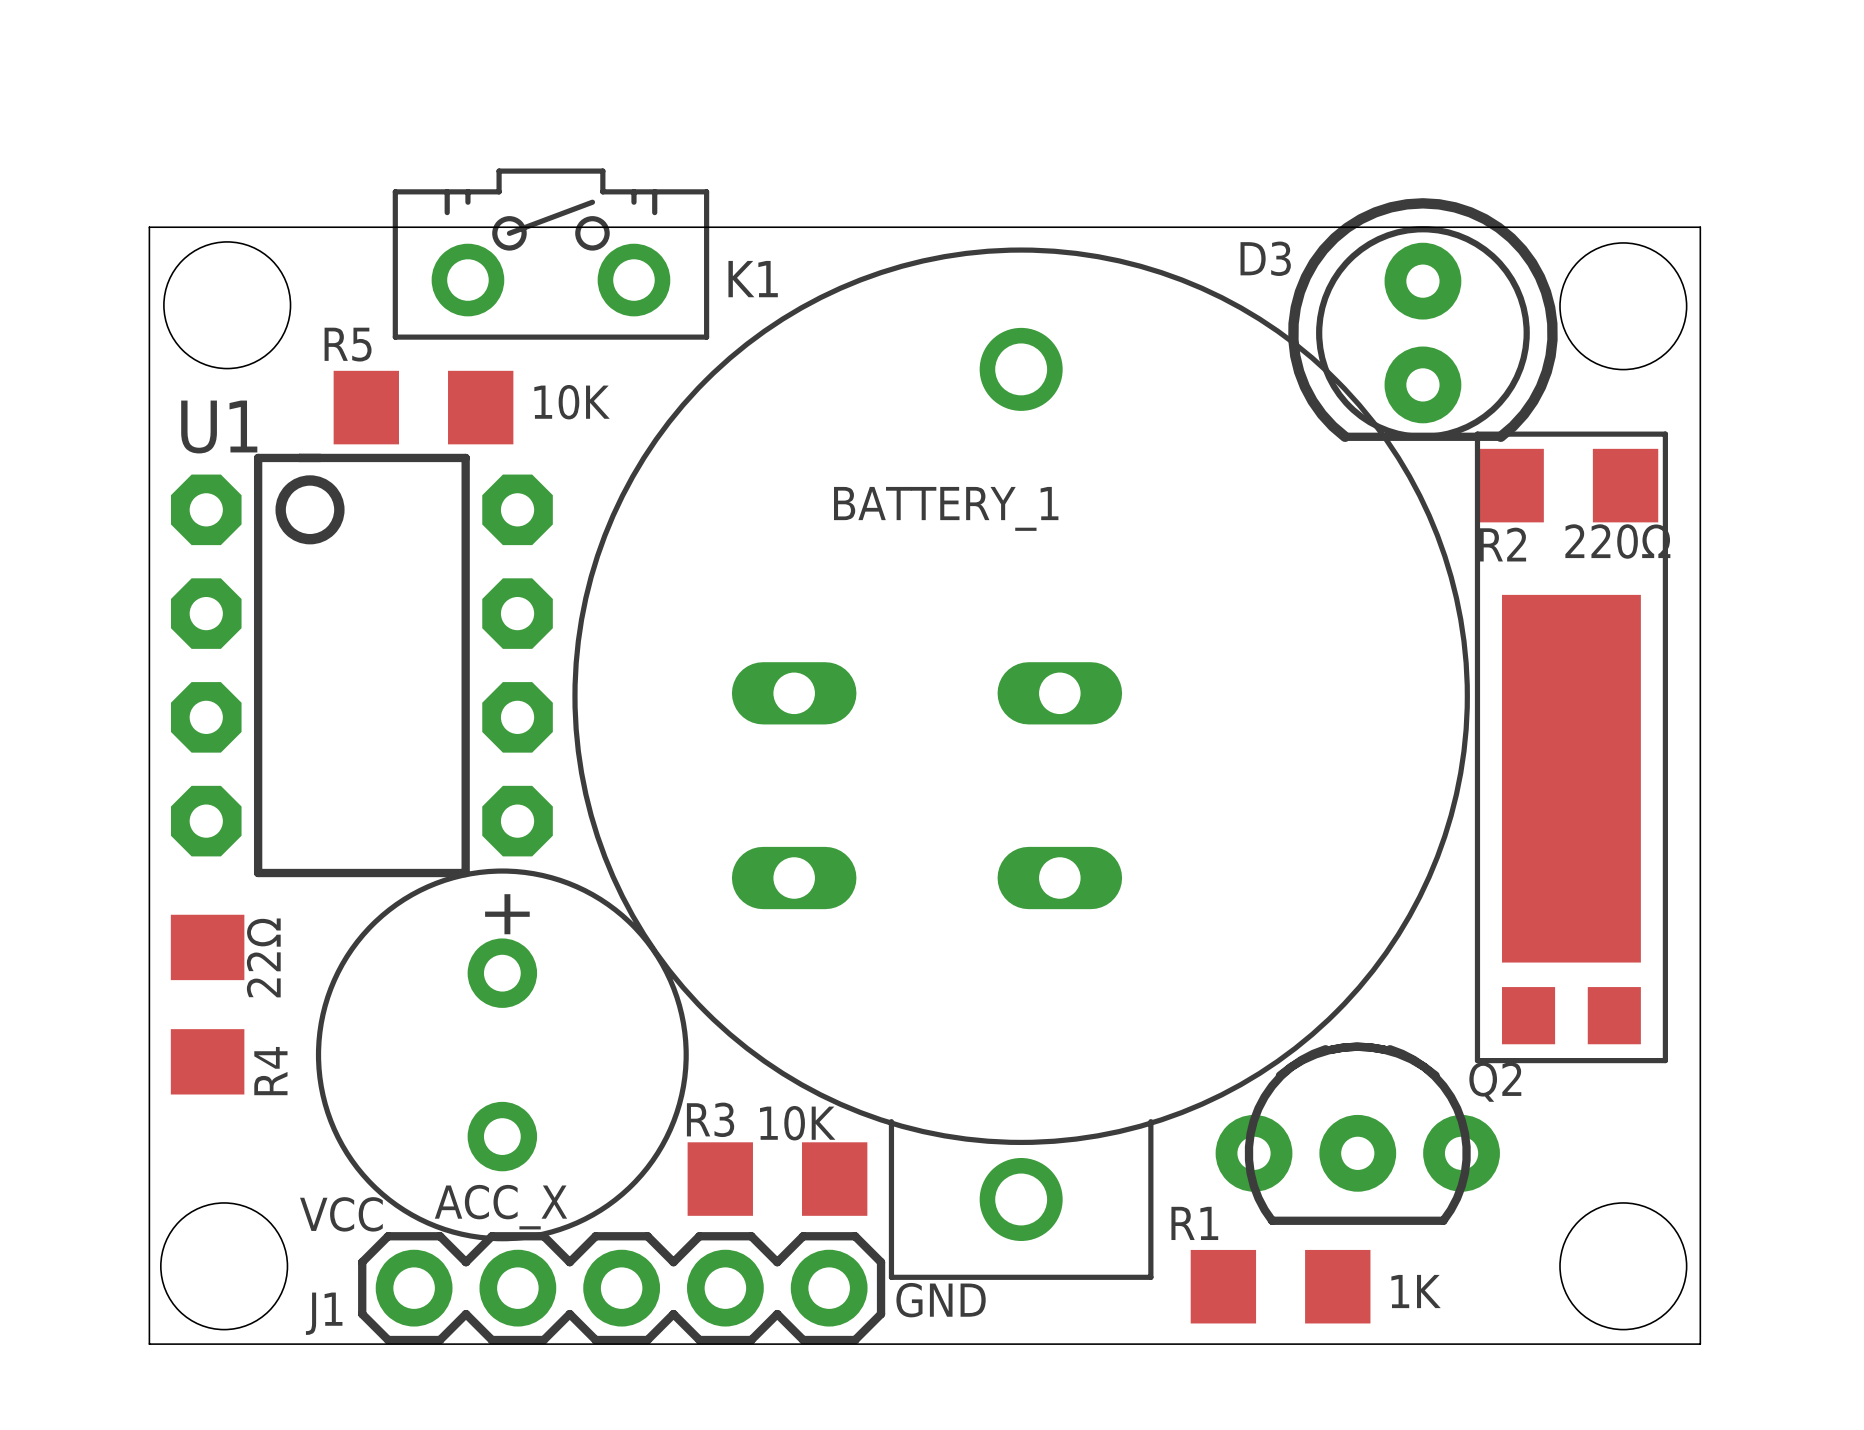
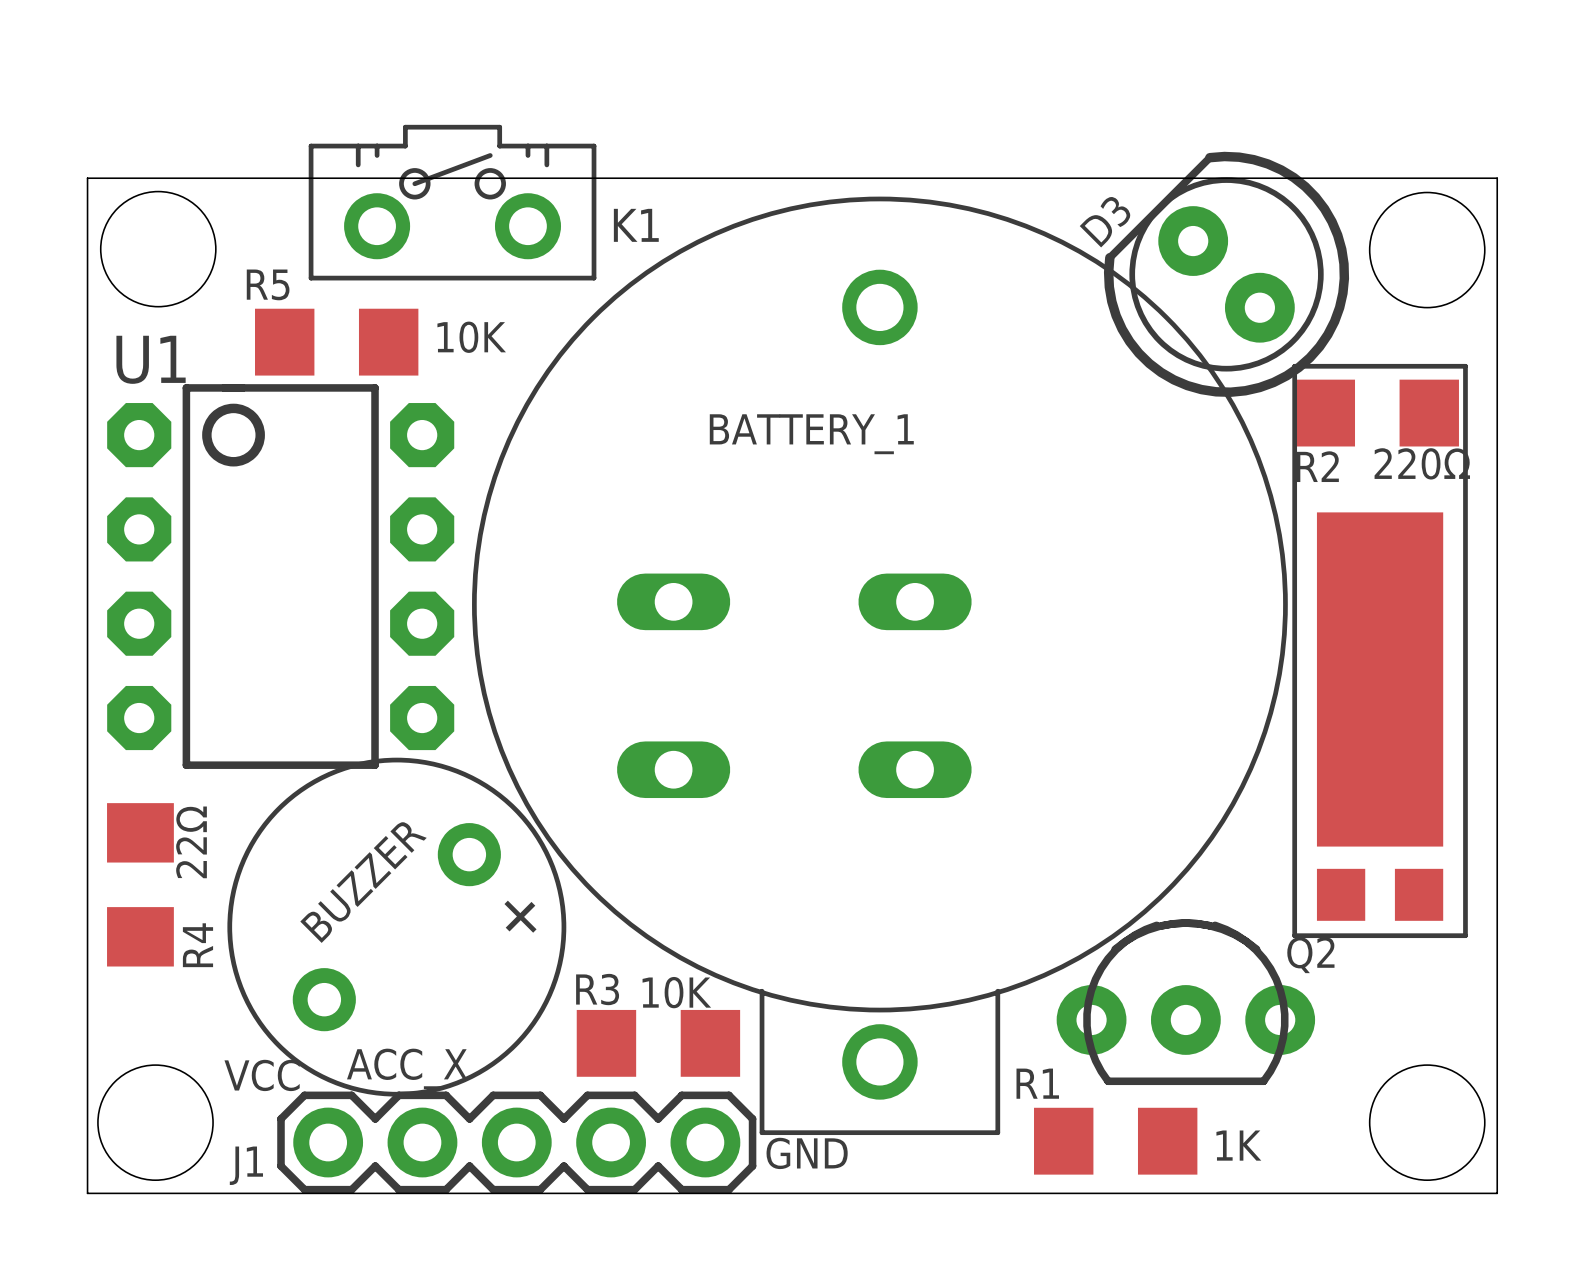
D3 rotation: 0° (1422, 320) -> 135° clockwise (1226, 274)
part footprint: [315, 868, 689, 1242] -> [227, 757, 567, 1097]
text: none -> BUZZER (363, 882)

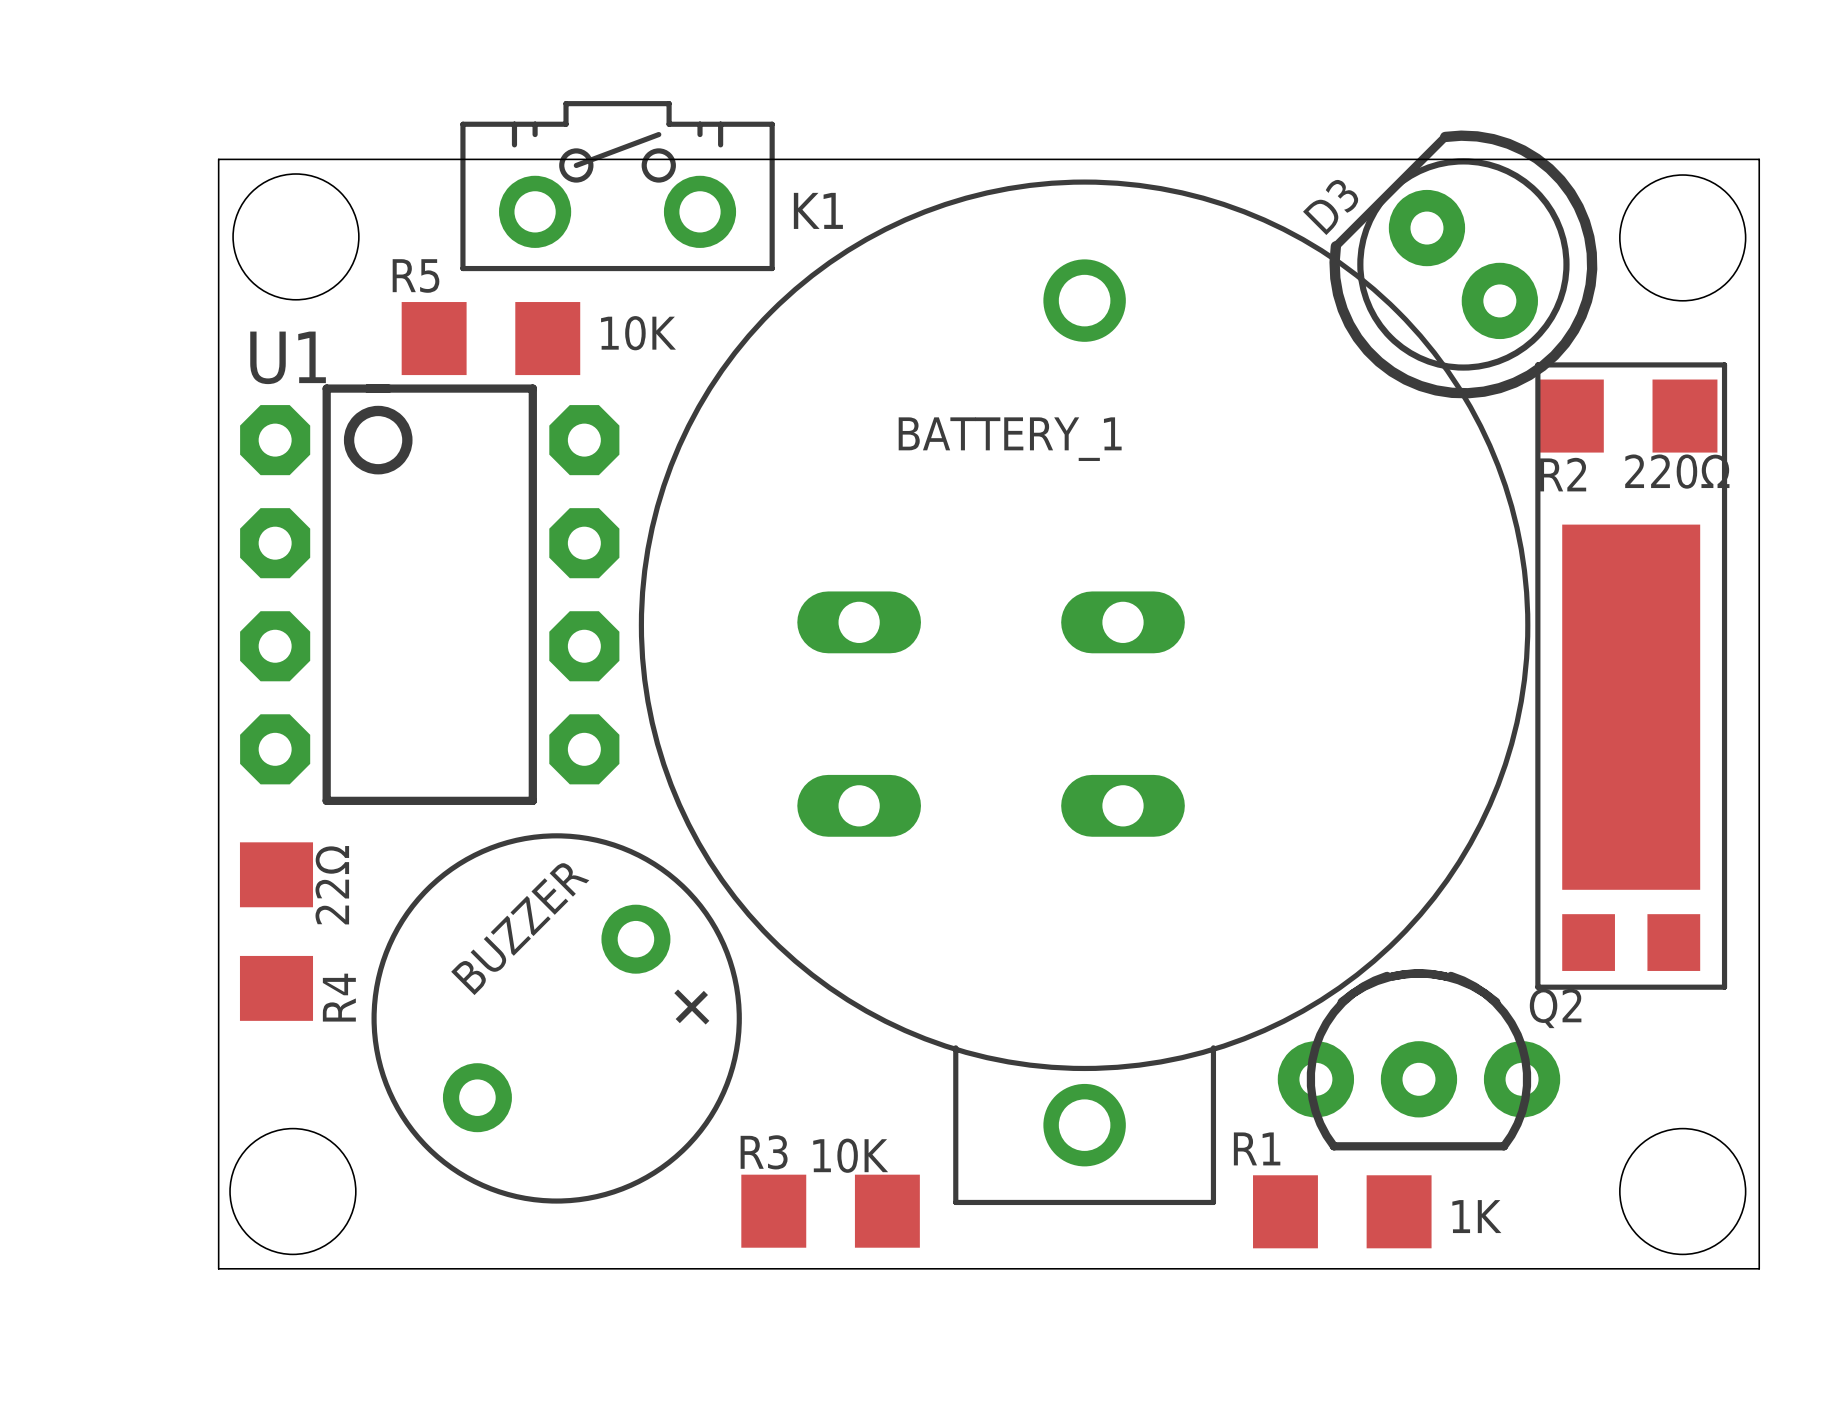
part position: (396, 927) -> (556, 1018)
R3 position: (658, 1043) -> (830, 1211)
text: ACC_X (407, 1068) -> none
text: VCC (262, 1075) -> none
J1: (516, 1142) -> none
text: GND (807, 1153) -> none

